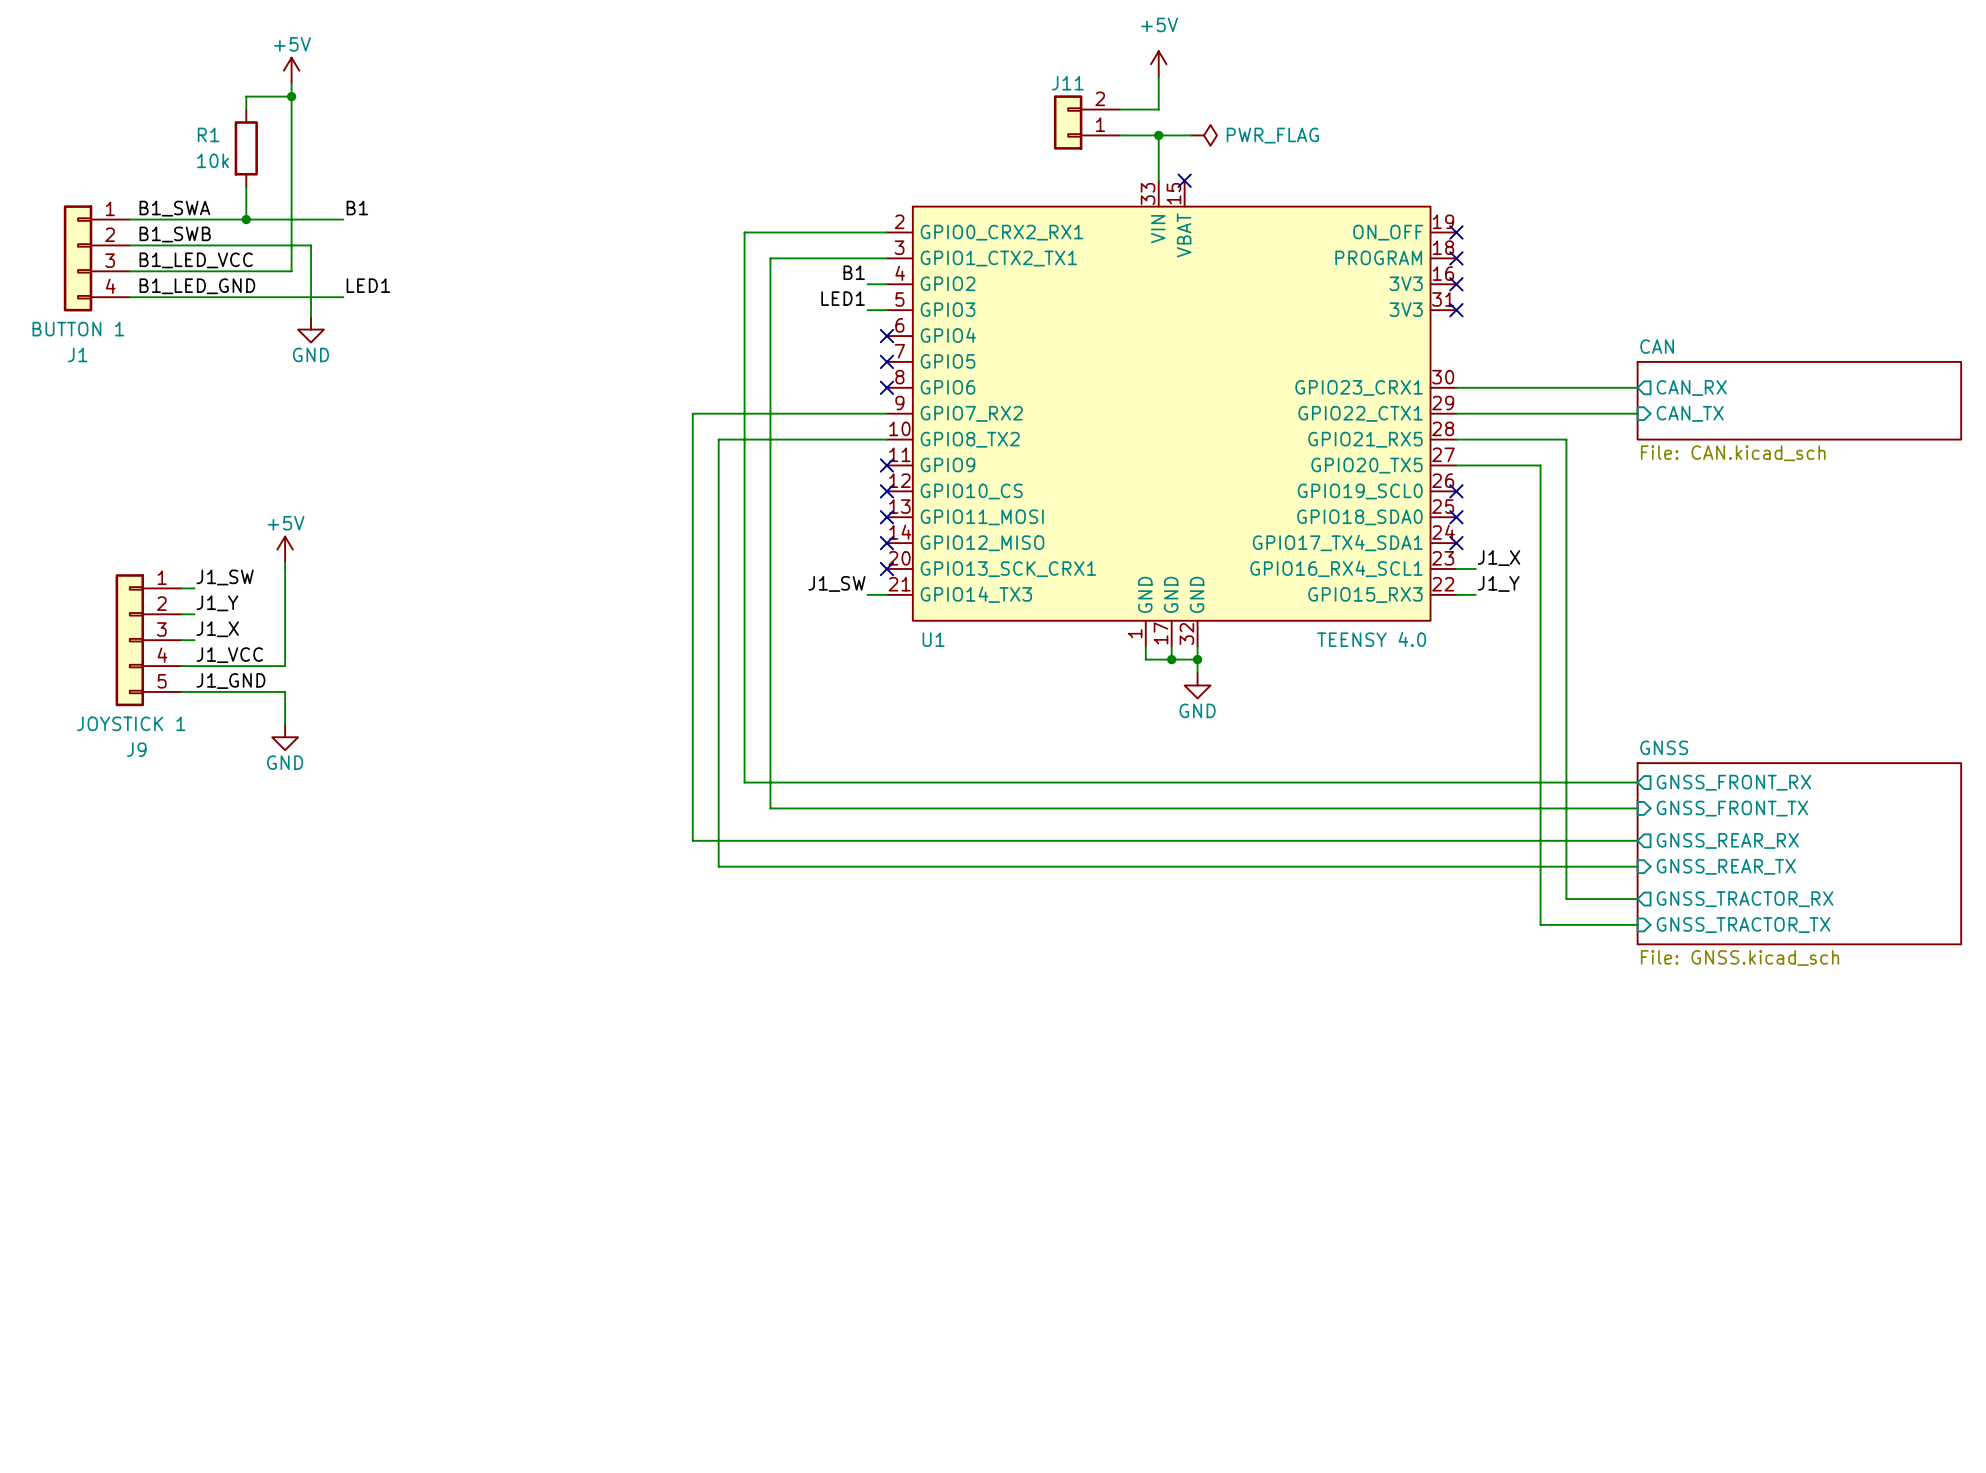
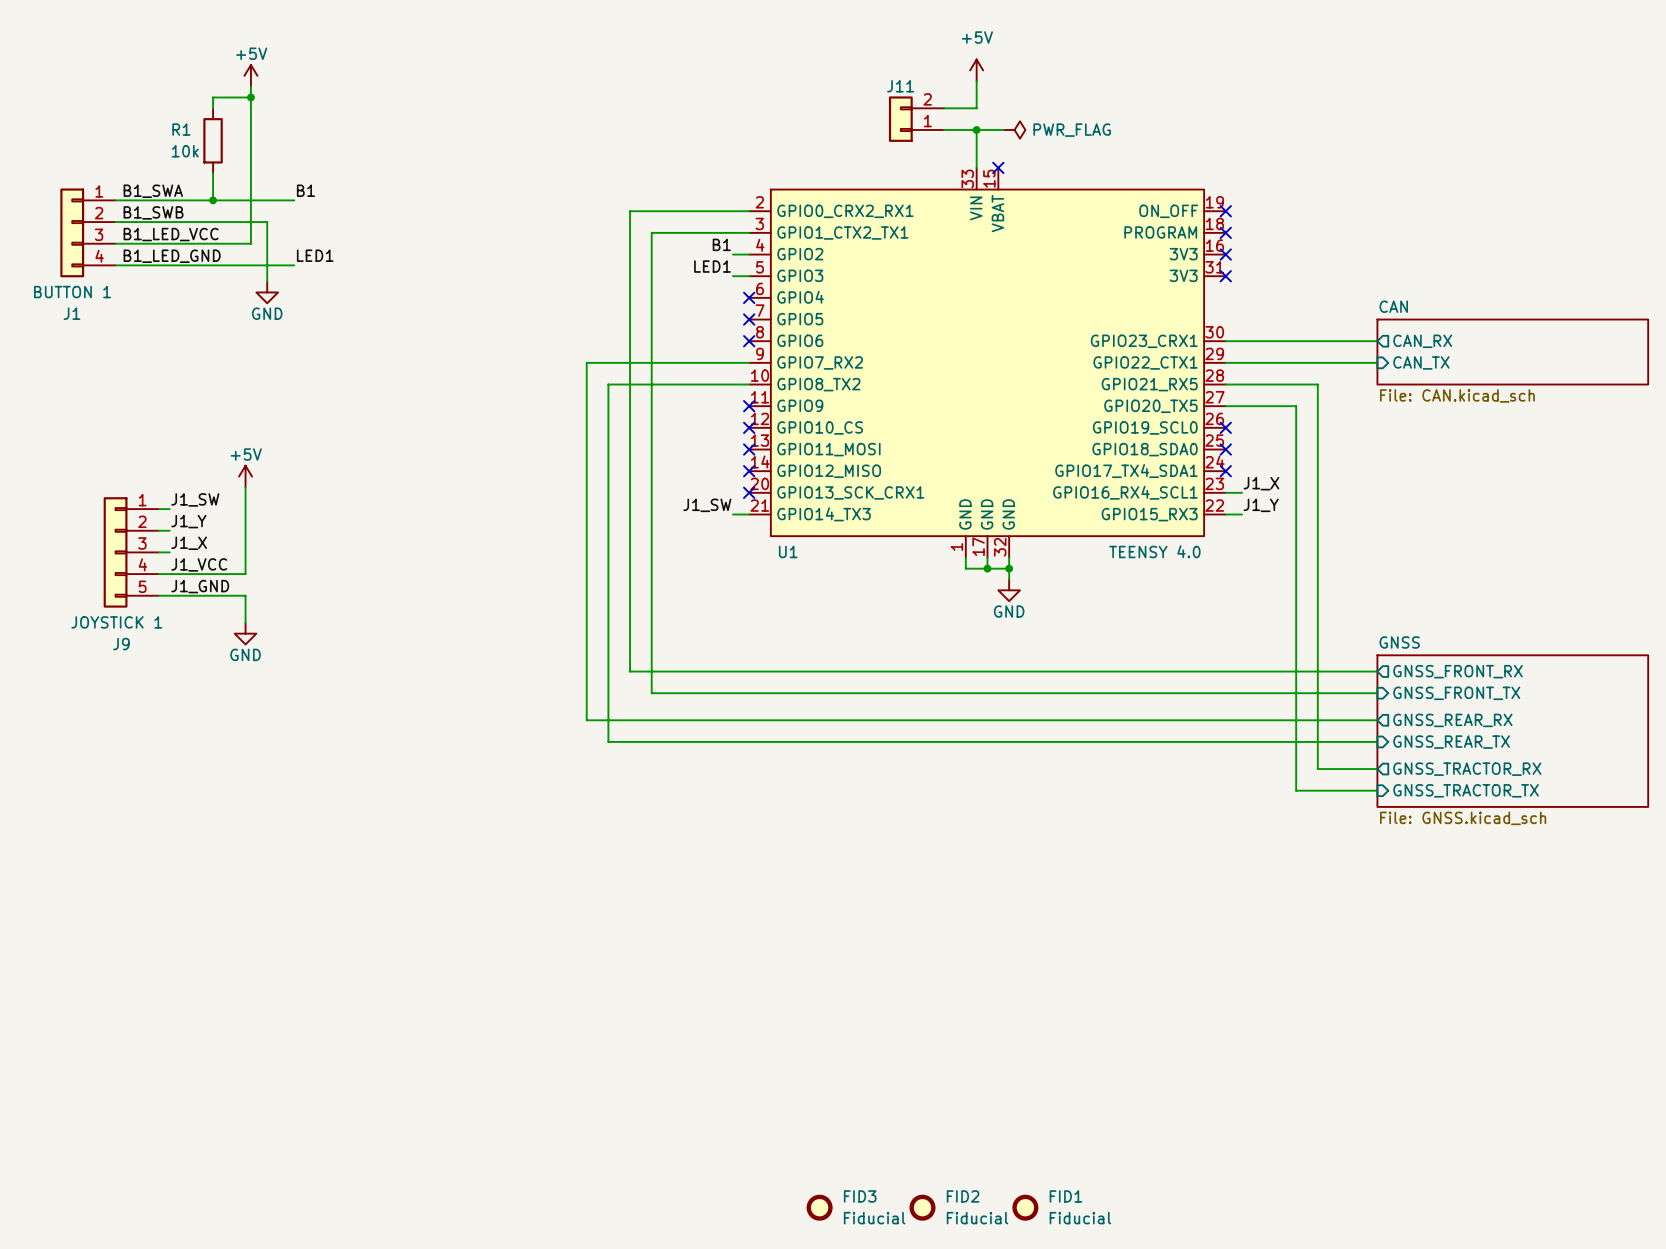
FID3: none -> Fiducial (819, 1207)
FID2: none -> Fiducial (922, 1207)
FID1: none -> Fiducial (1025, 1207)

